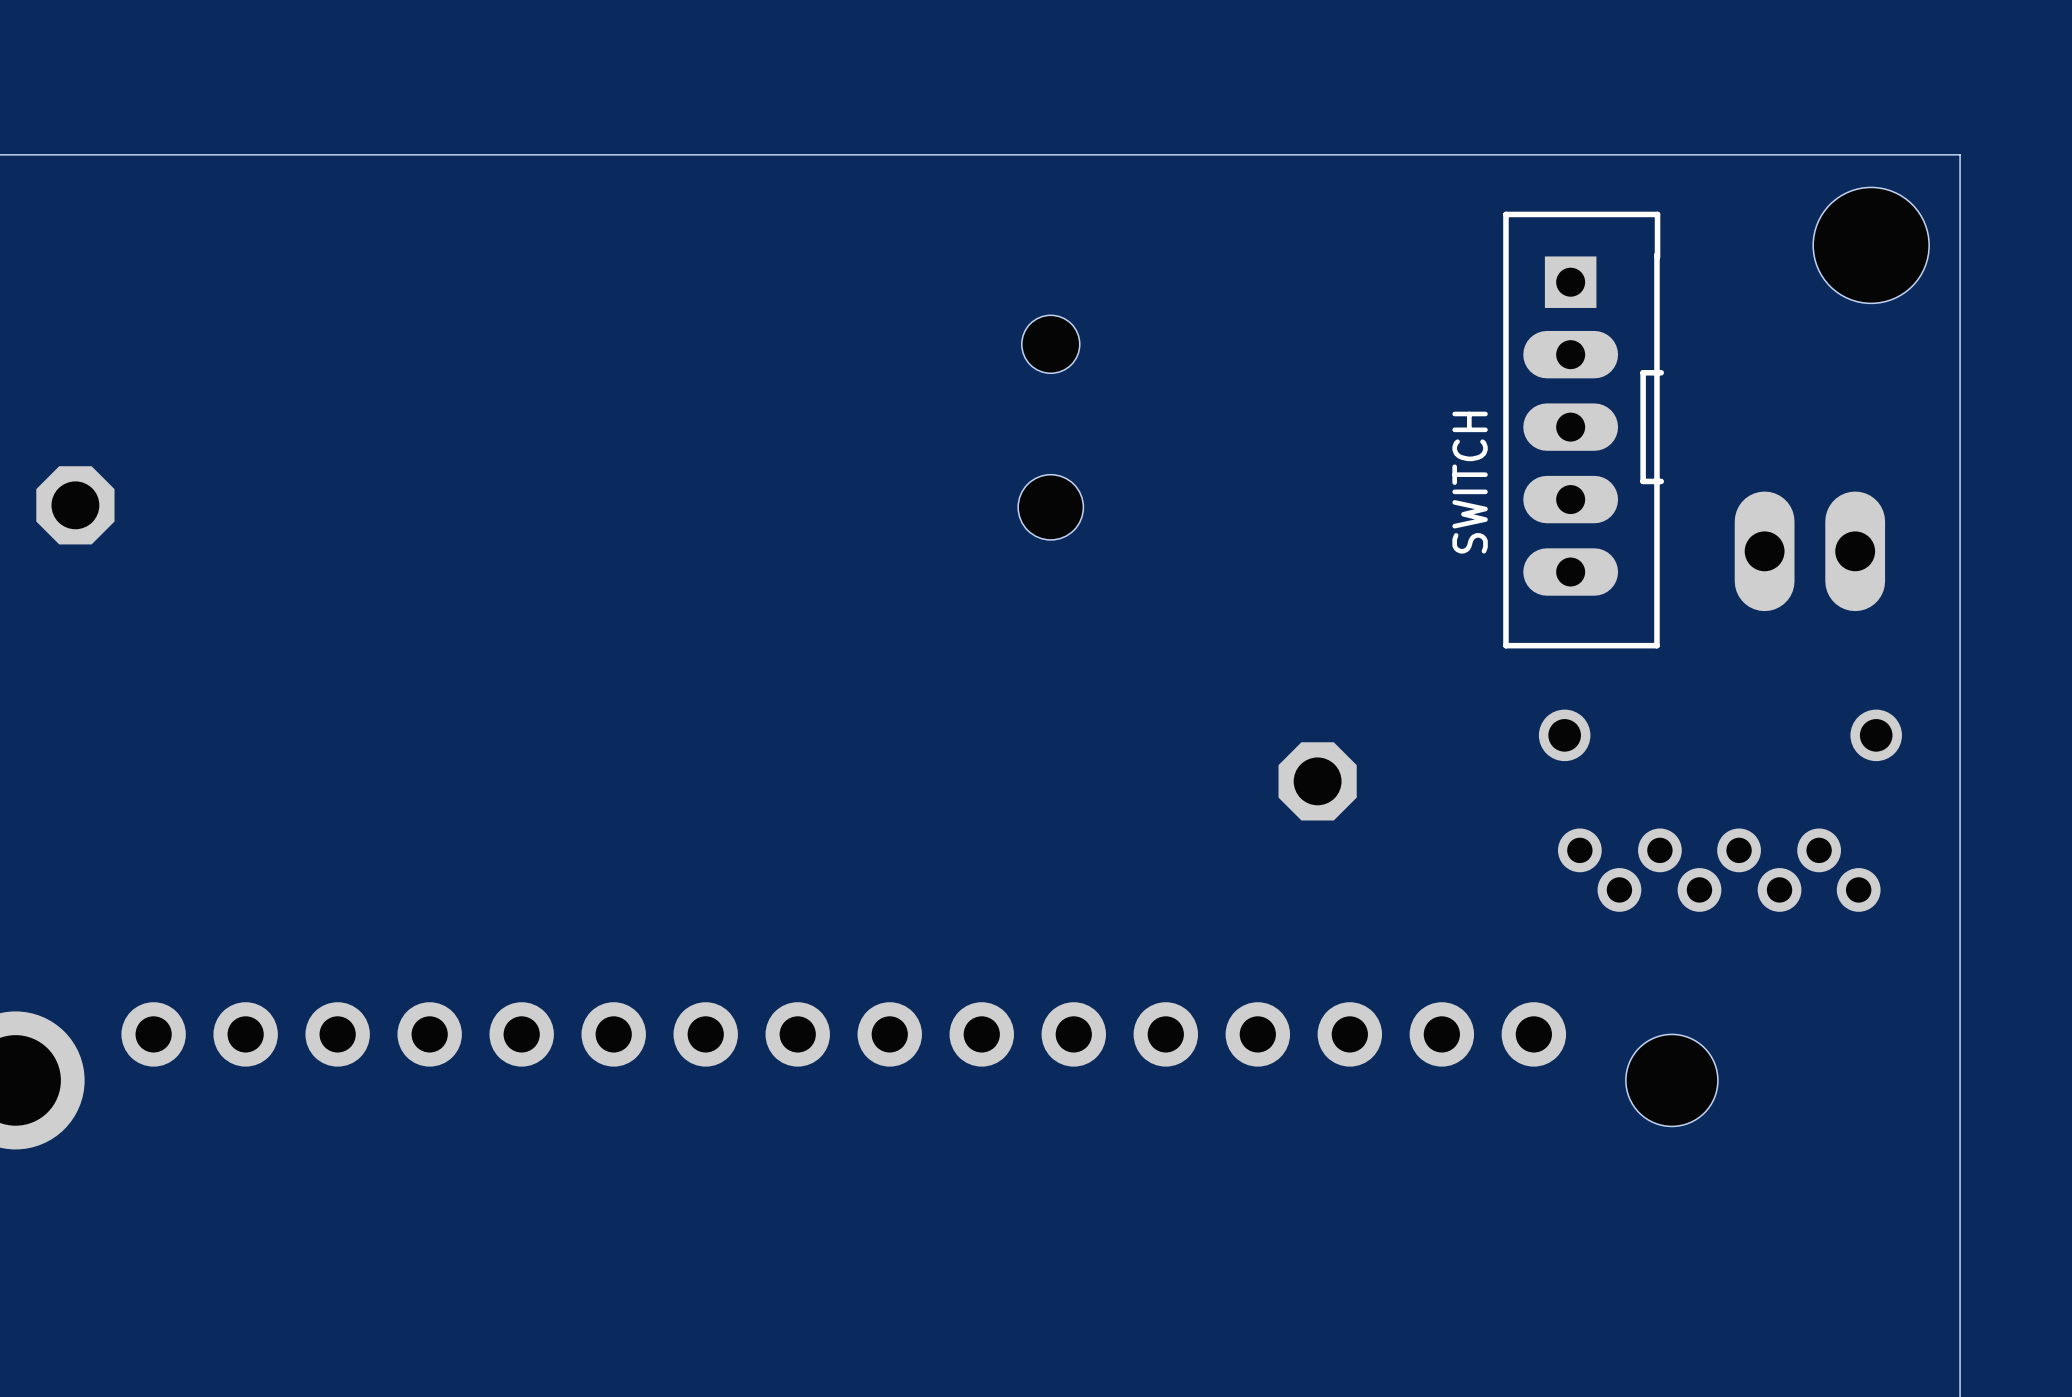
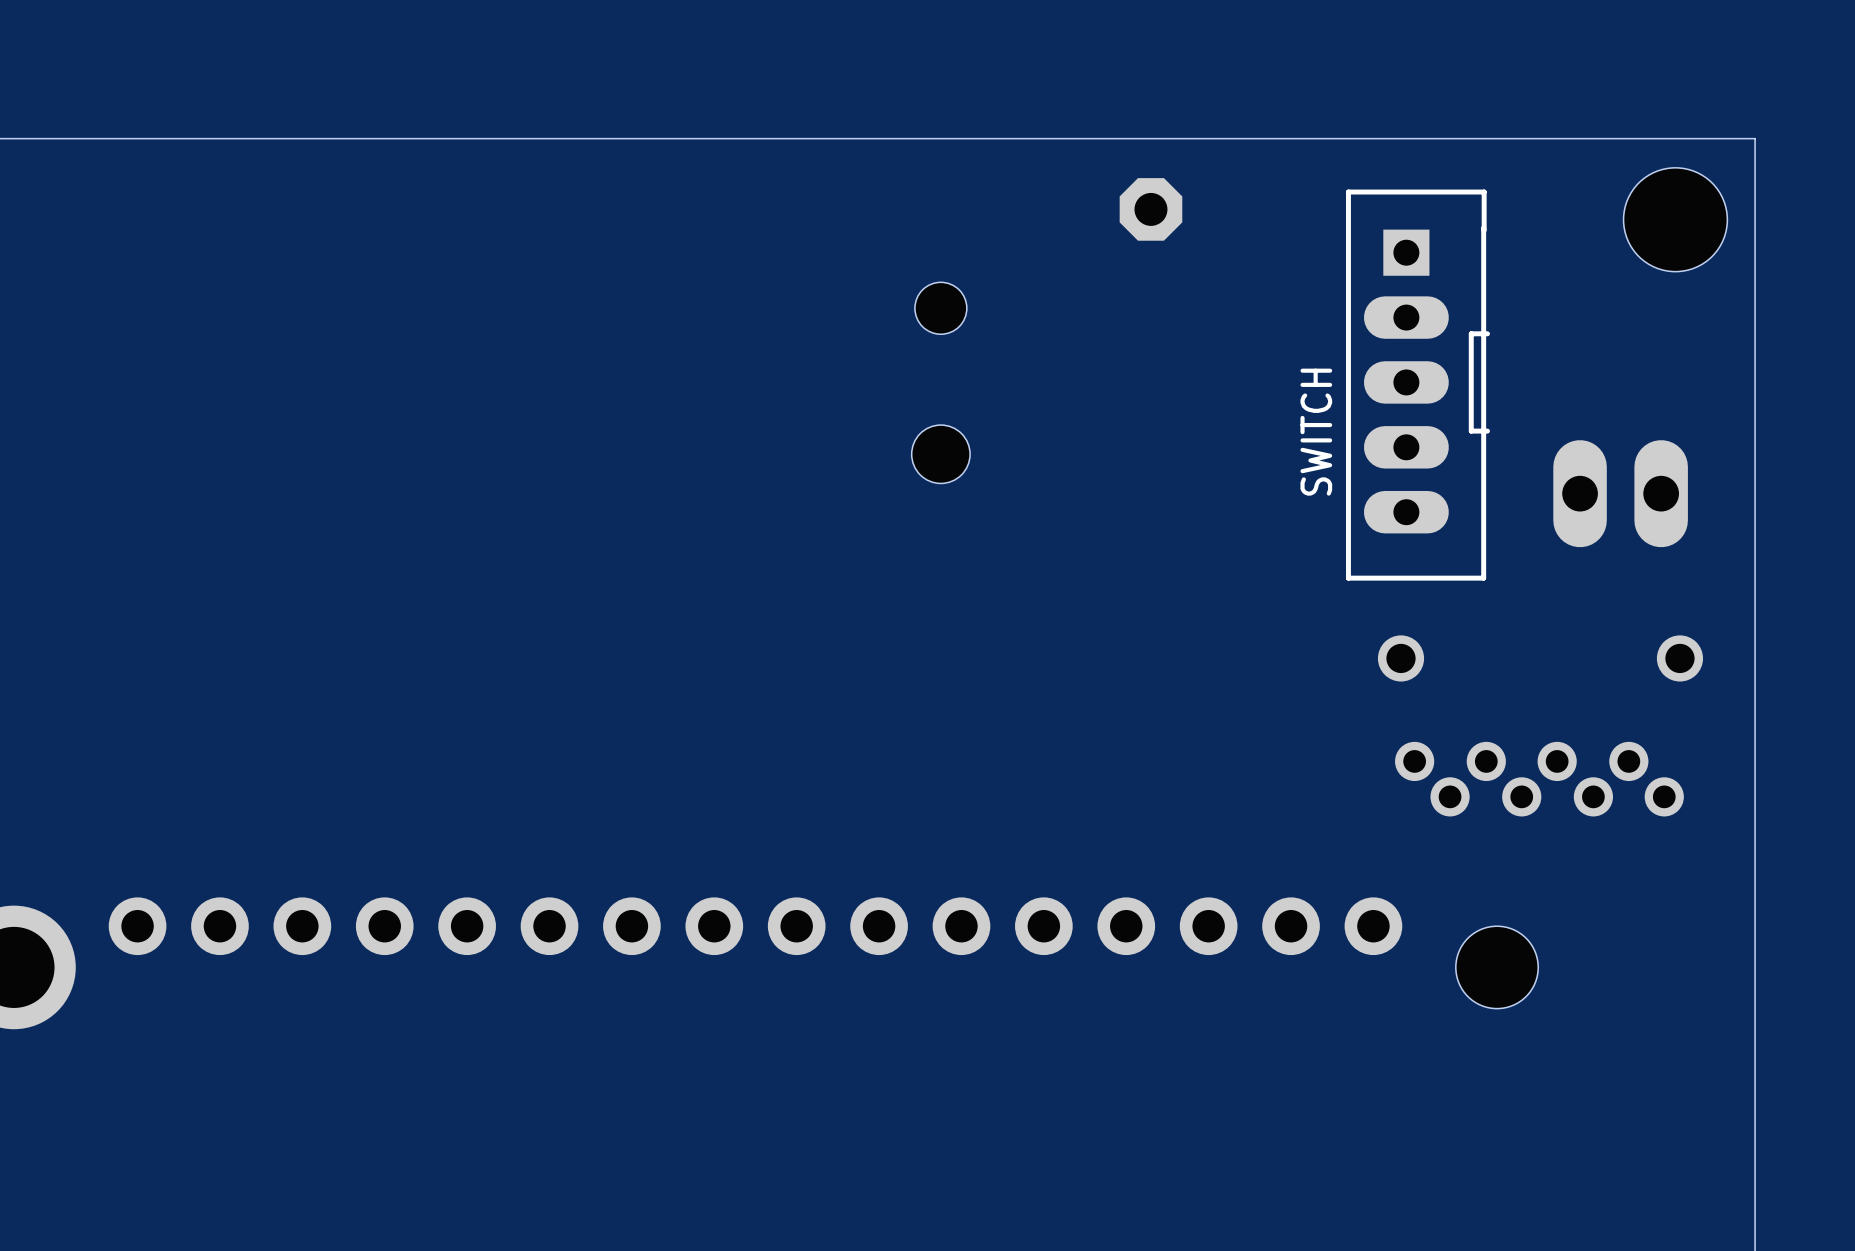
part: none -> (1150, 209)
part: (75, 505) -> none
part: (1317, 781) -> none

